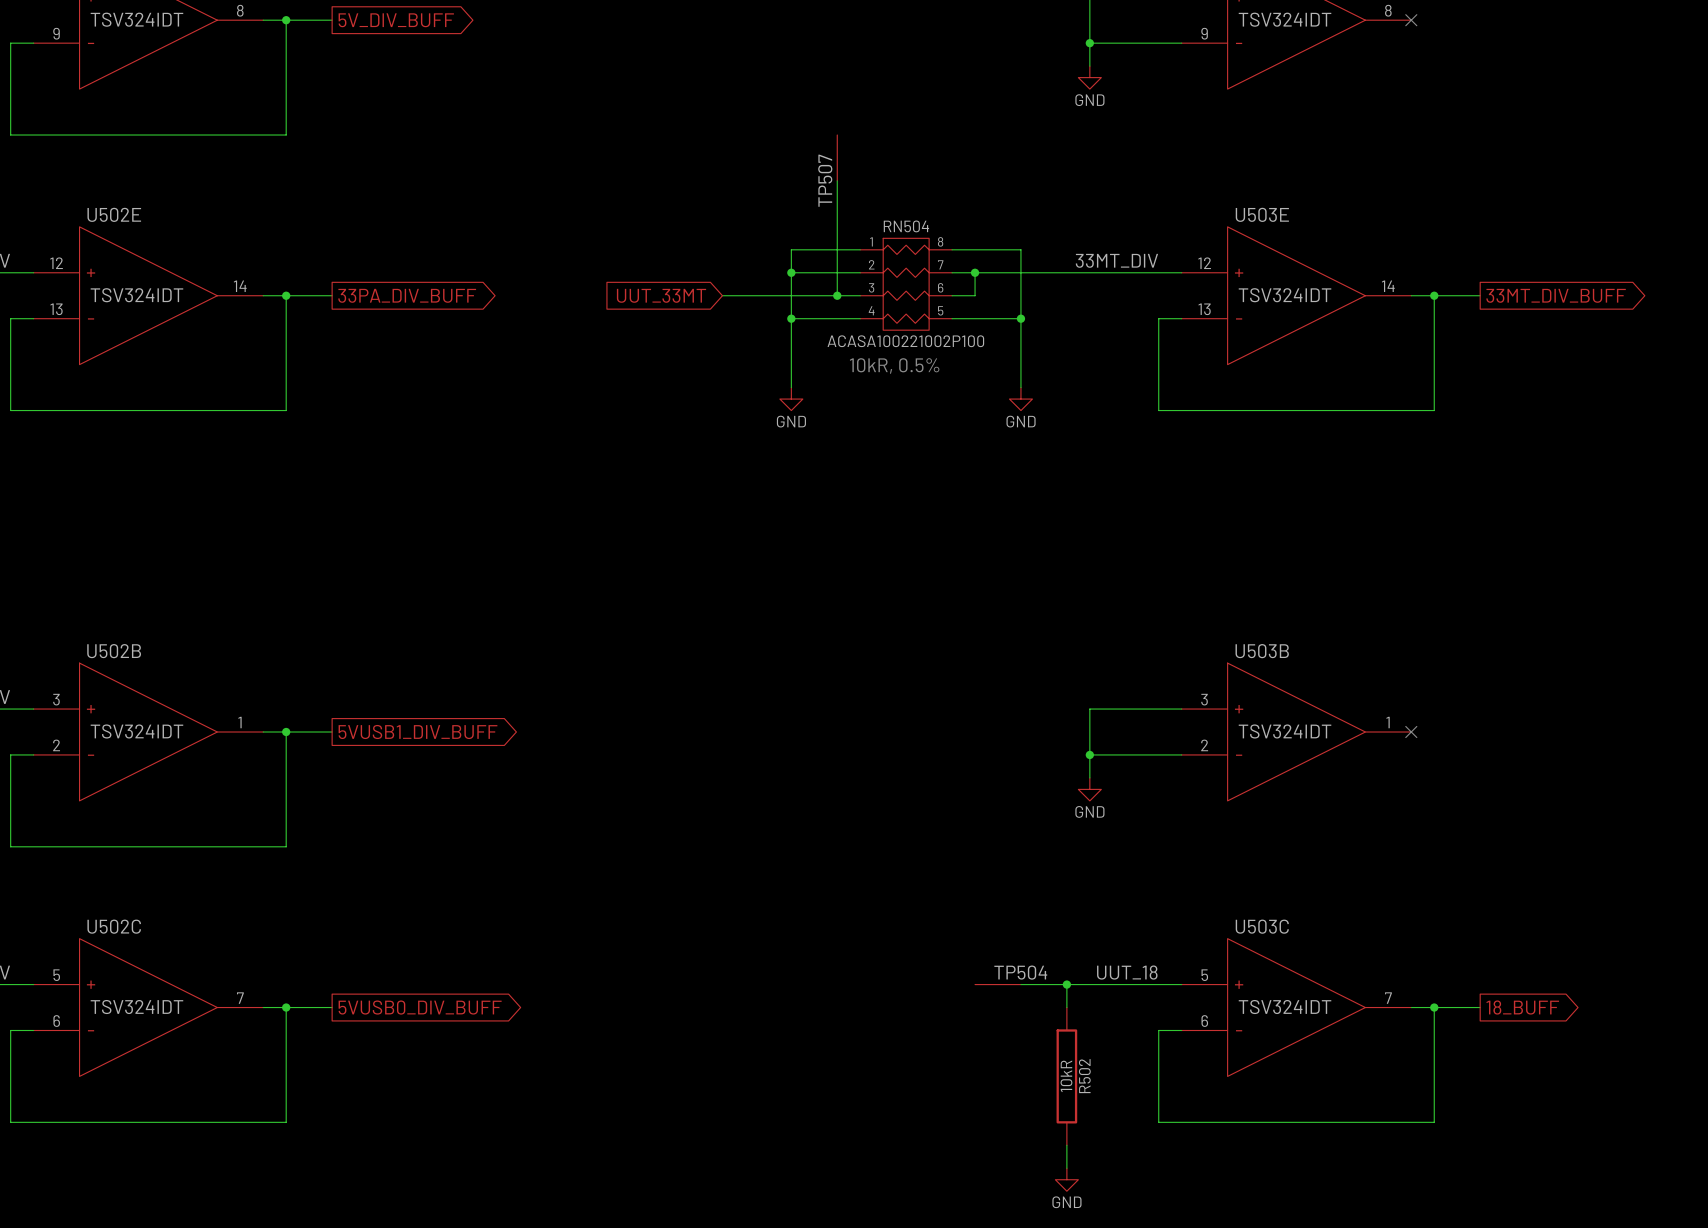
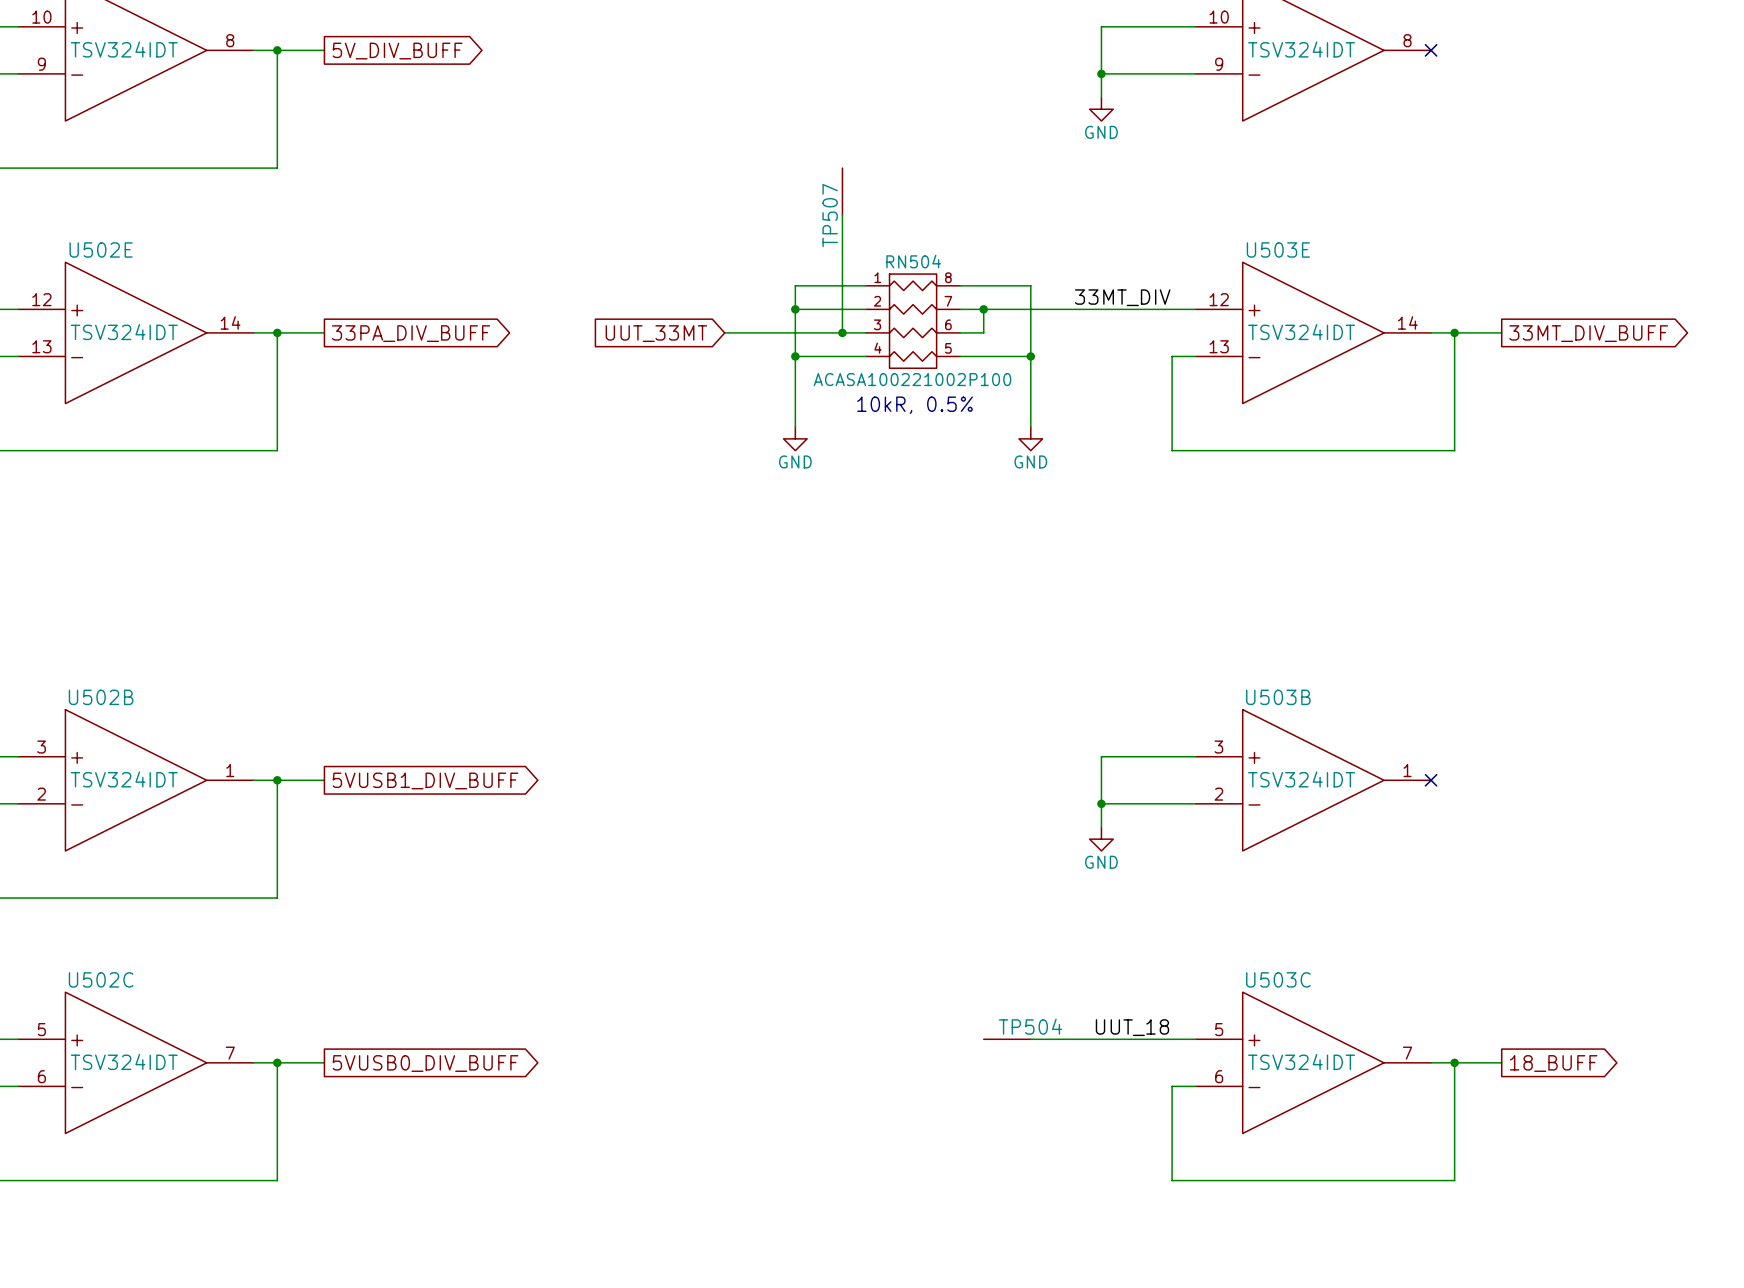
wire: (1066, 984) (1066, 1007) -> none
junction: (1066, 984) -> none
R502: 10kR (1066, 1076) -> none
wire: (1066, 1145) (1066, 1168) -> none
power symbol: GND (1066, 1179) -> none

